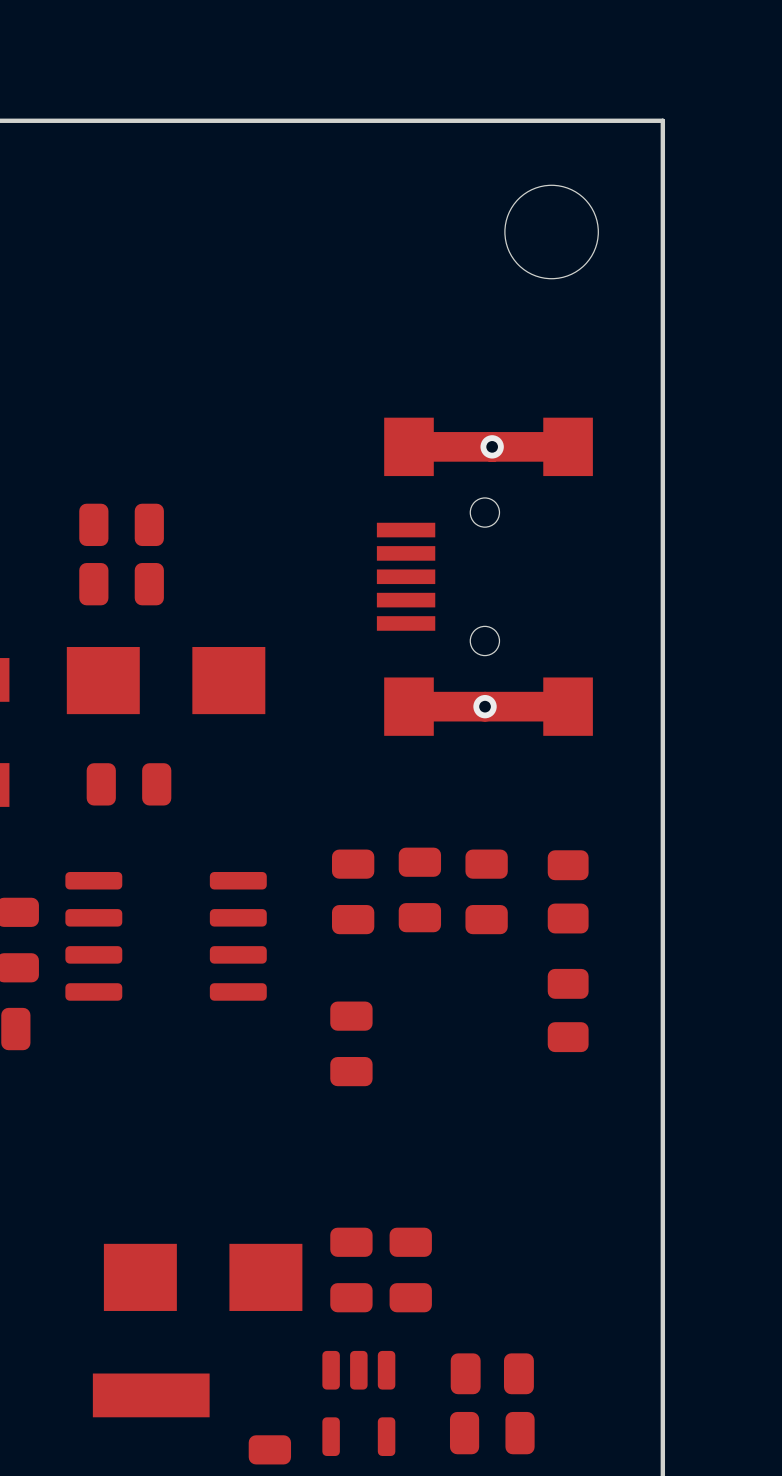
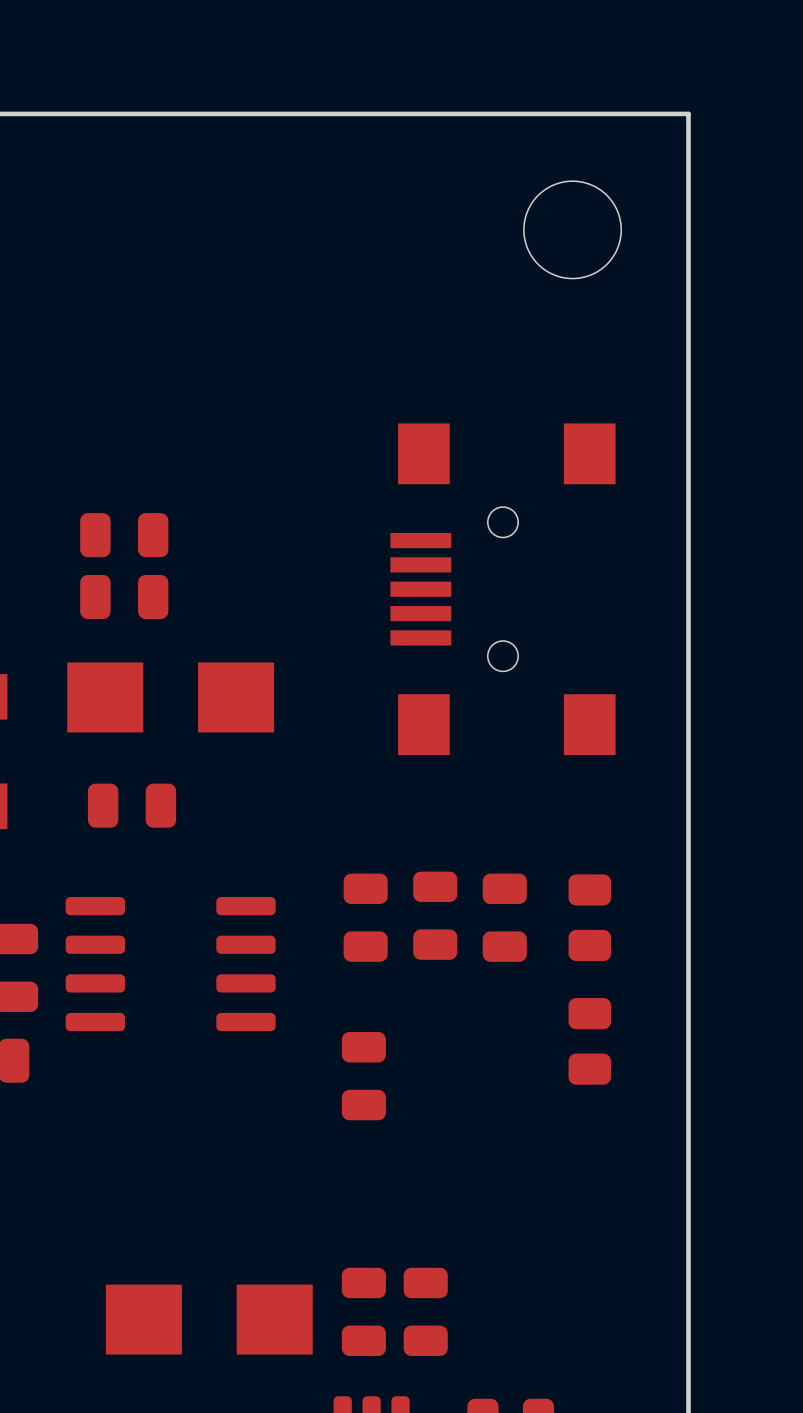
via: (492, 446) -> none
top track: (568, 446) (408, 446) -> none
via: (485, 706) -> none
top track: (568, 706) (408, 706) -> none

